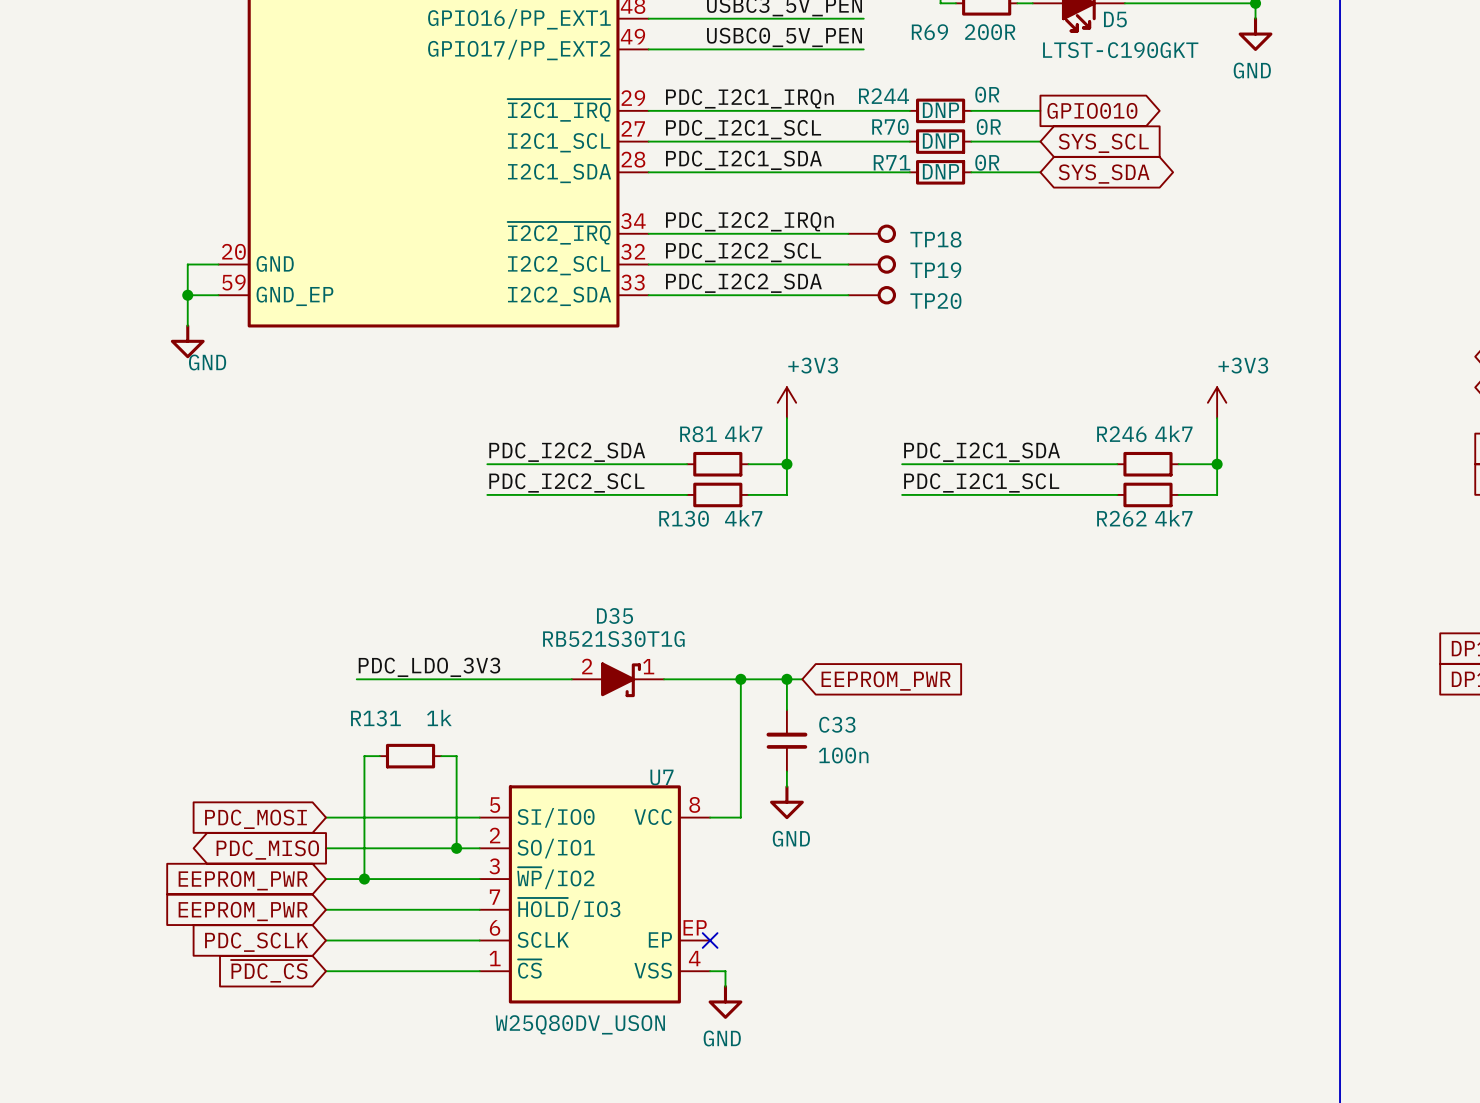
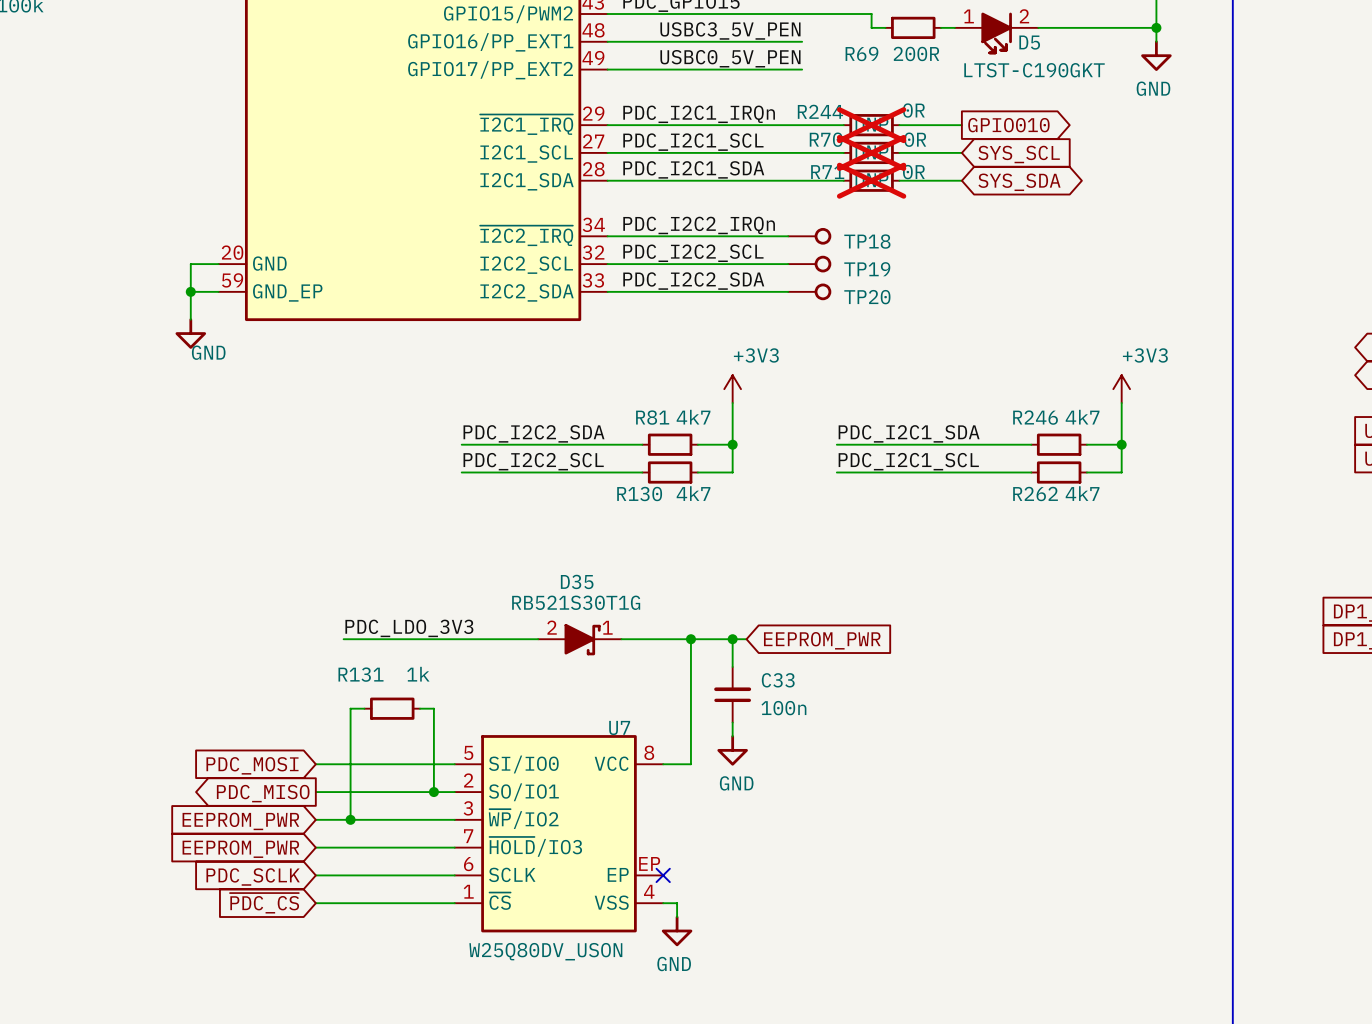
R244 do-not-place cross: none -> (871, 125)
R70 do-not-place cross: none -> (871, 152)
R71 do-not-place cross: none -> (871, 180)

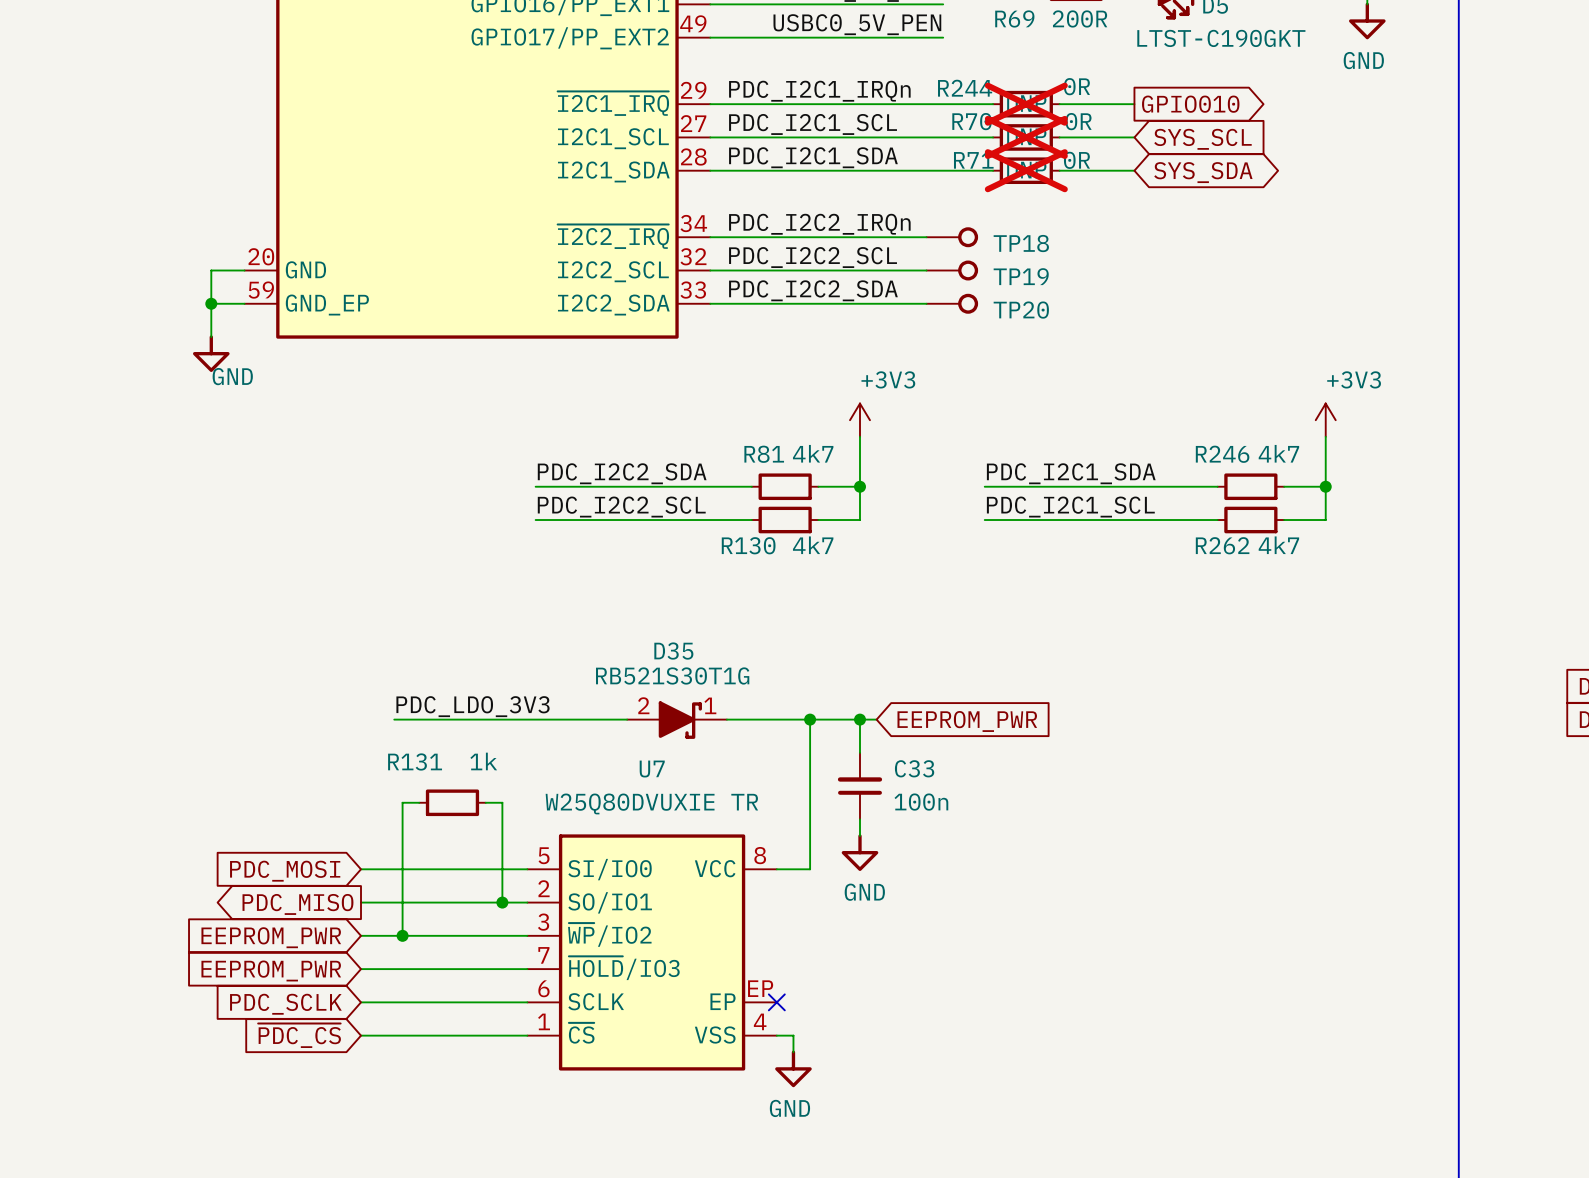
U7 text: none -> W25Q80DVUXIE TR (651, 803)
U7 name position: U7 (619, 727) -> U7 (652, 769)
U7 value: W25Q80DV_USON (545, 951) -> none

